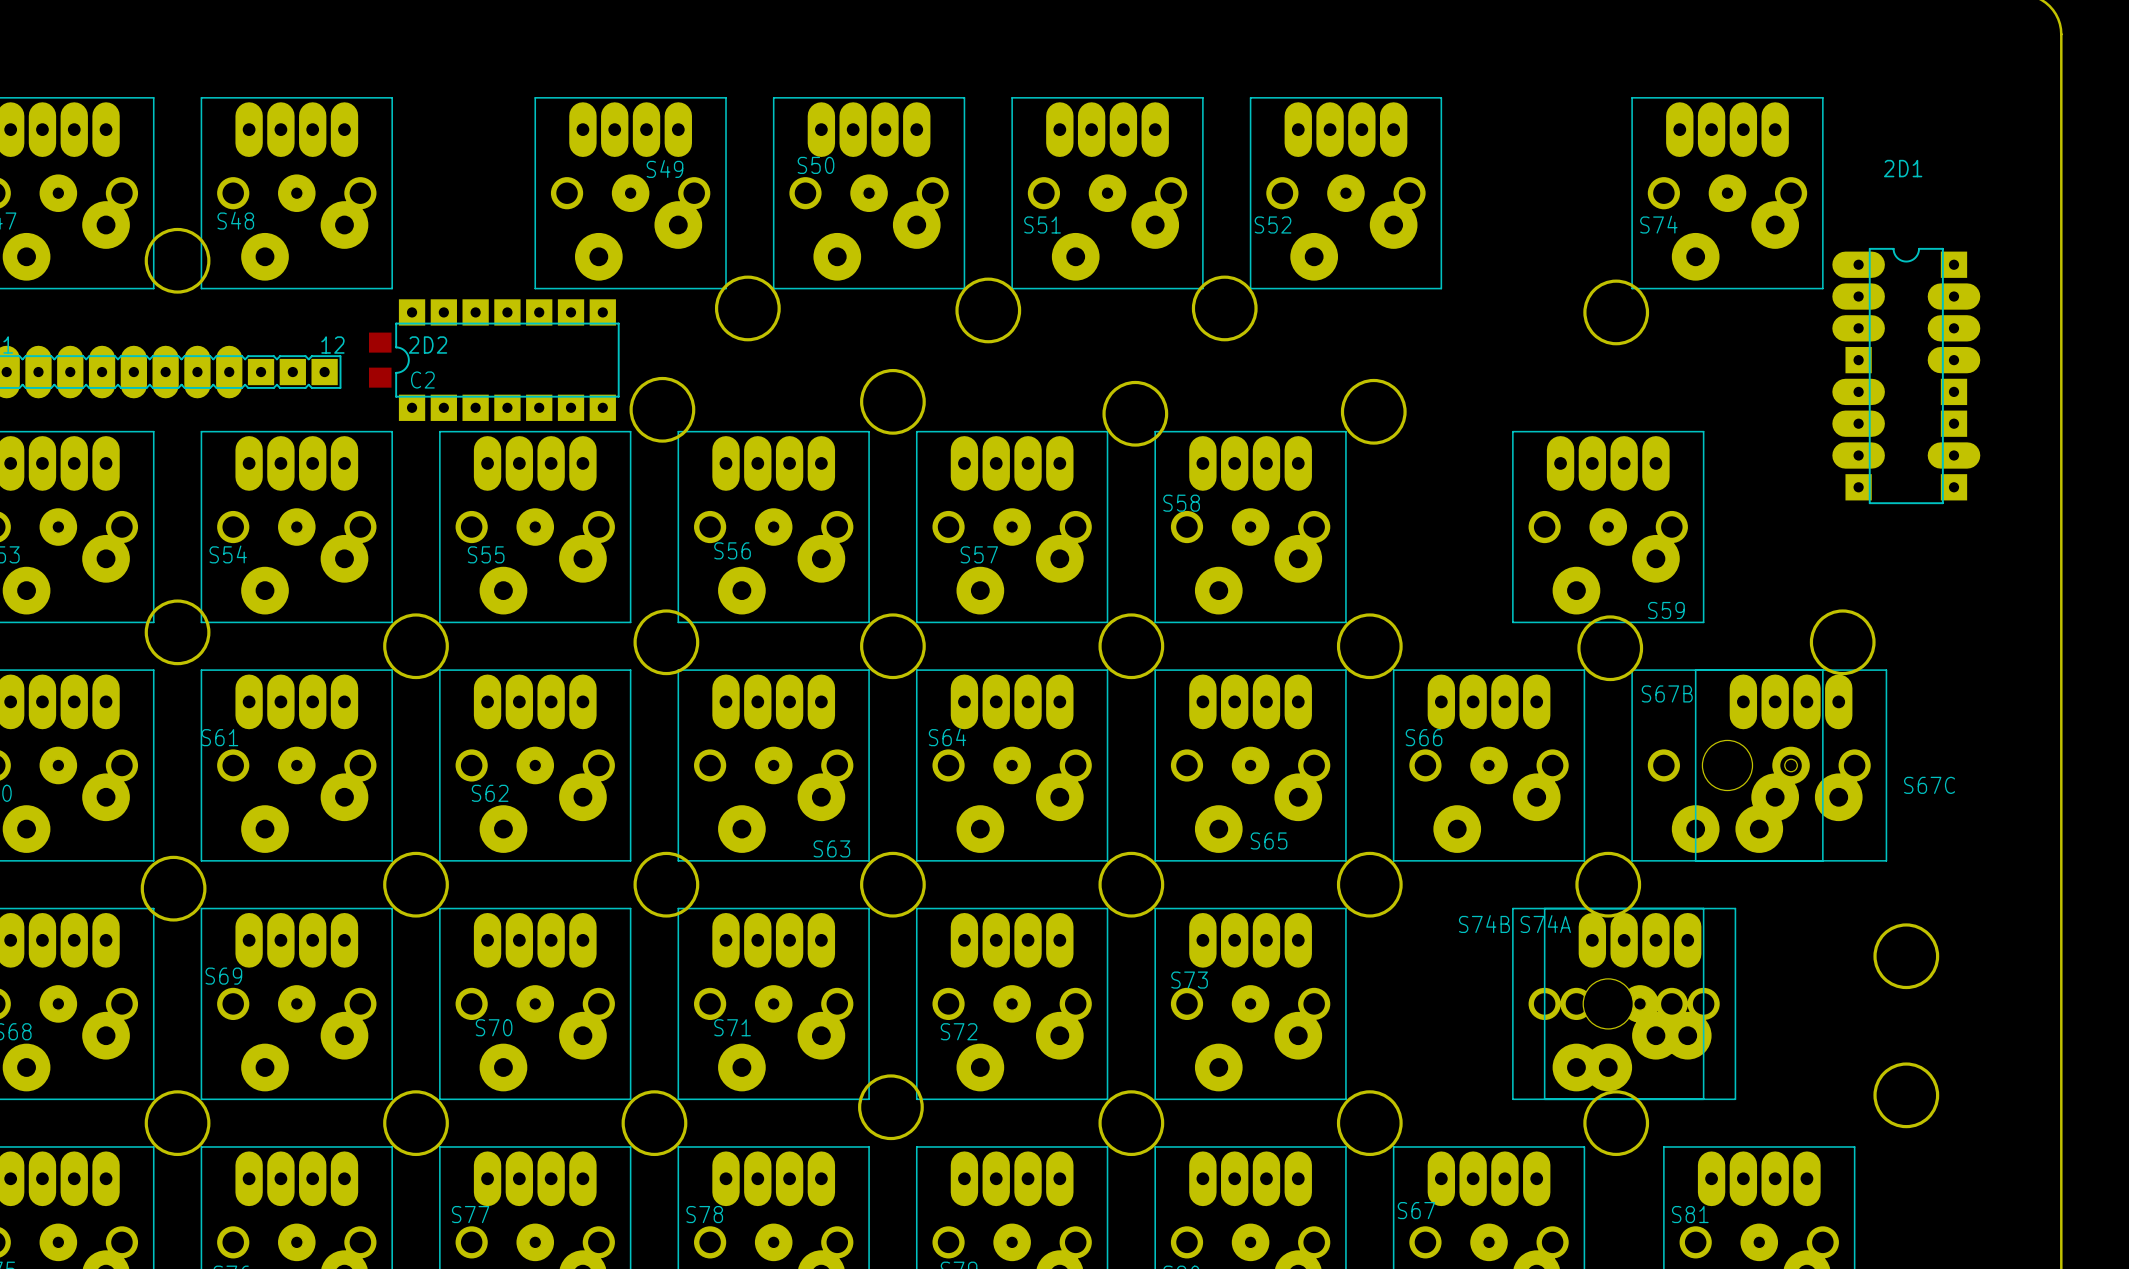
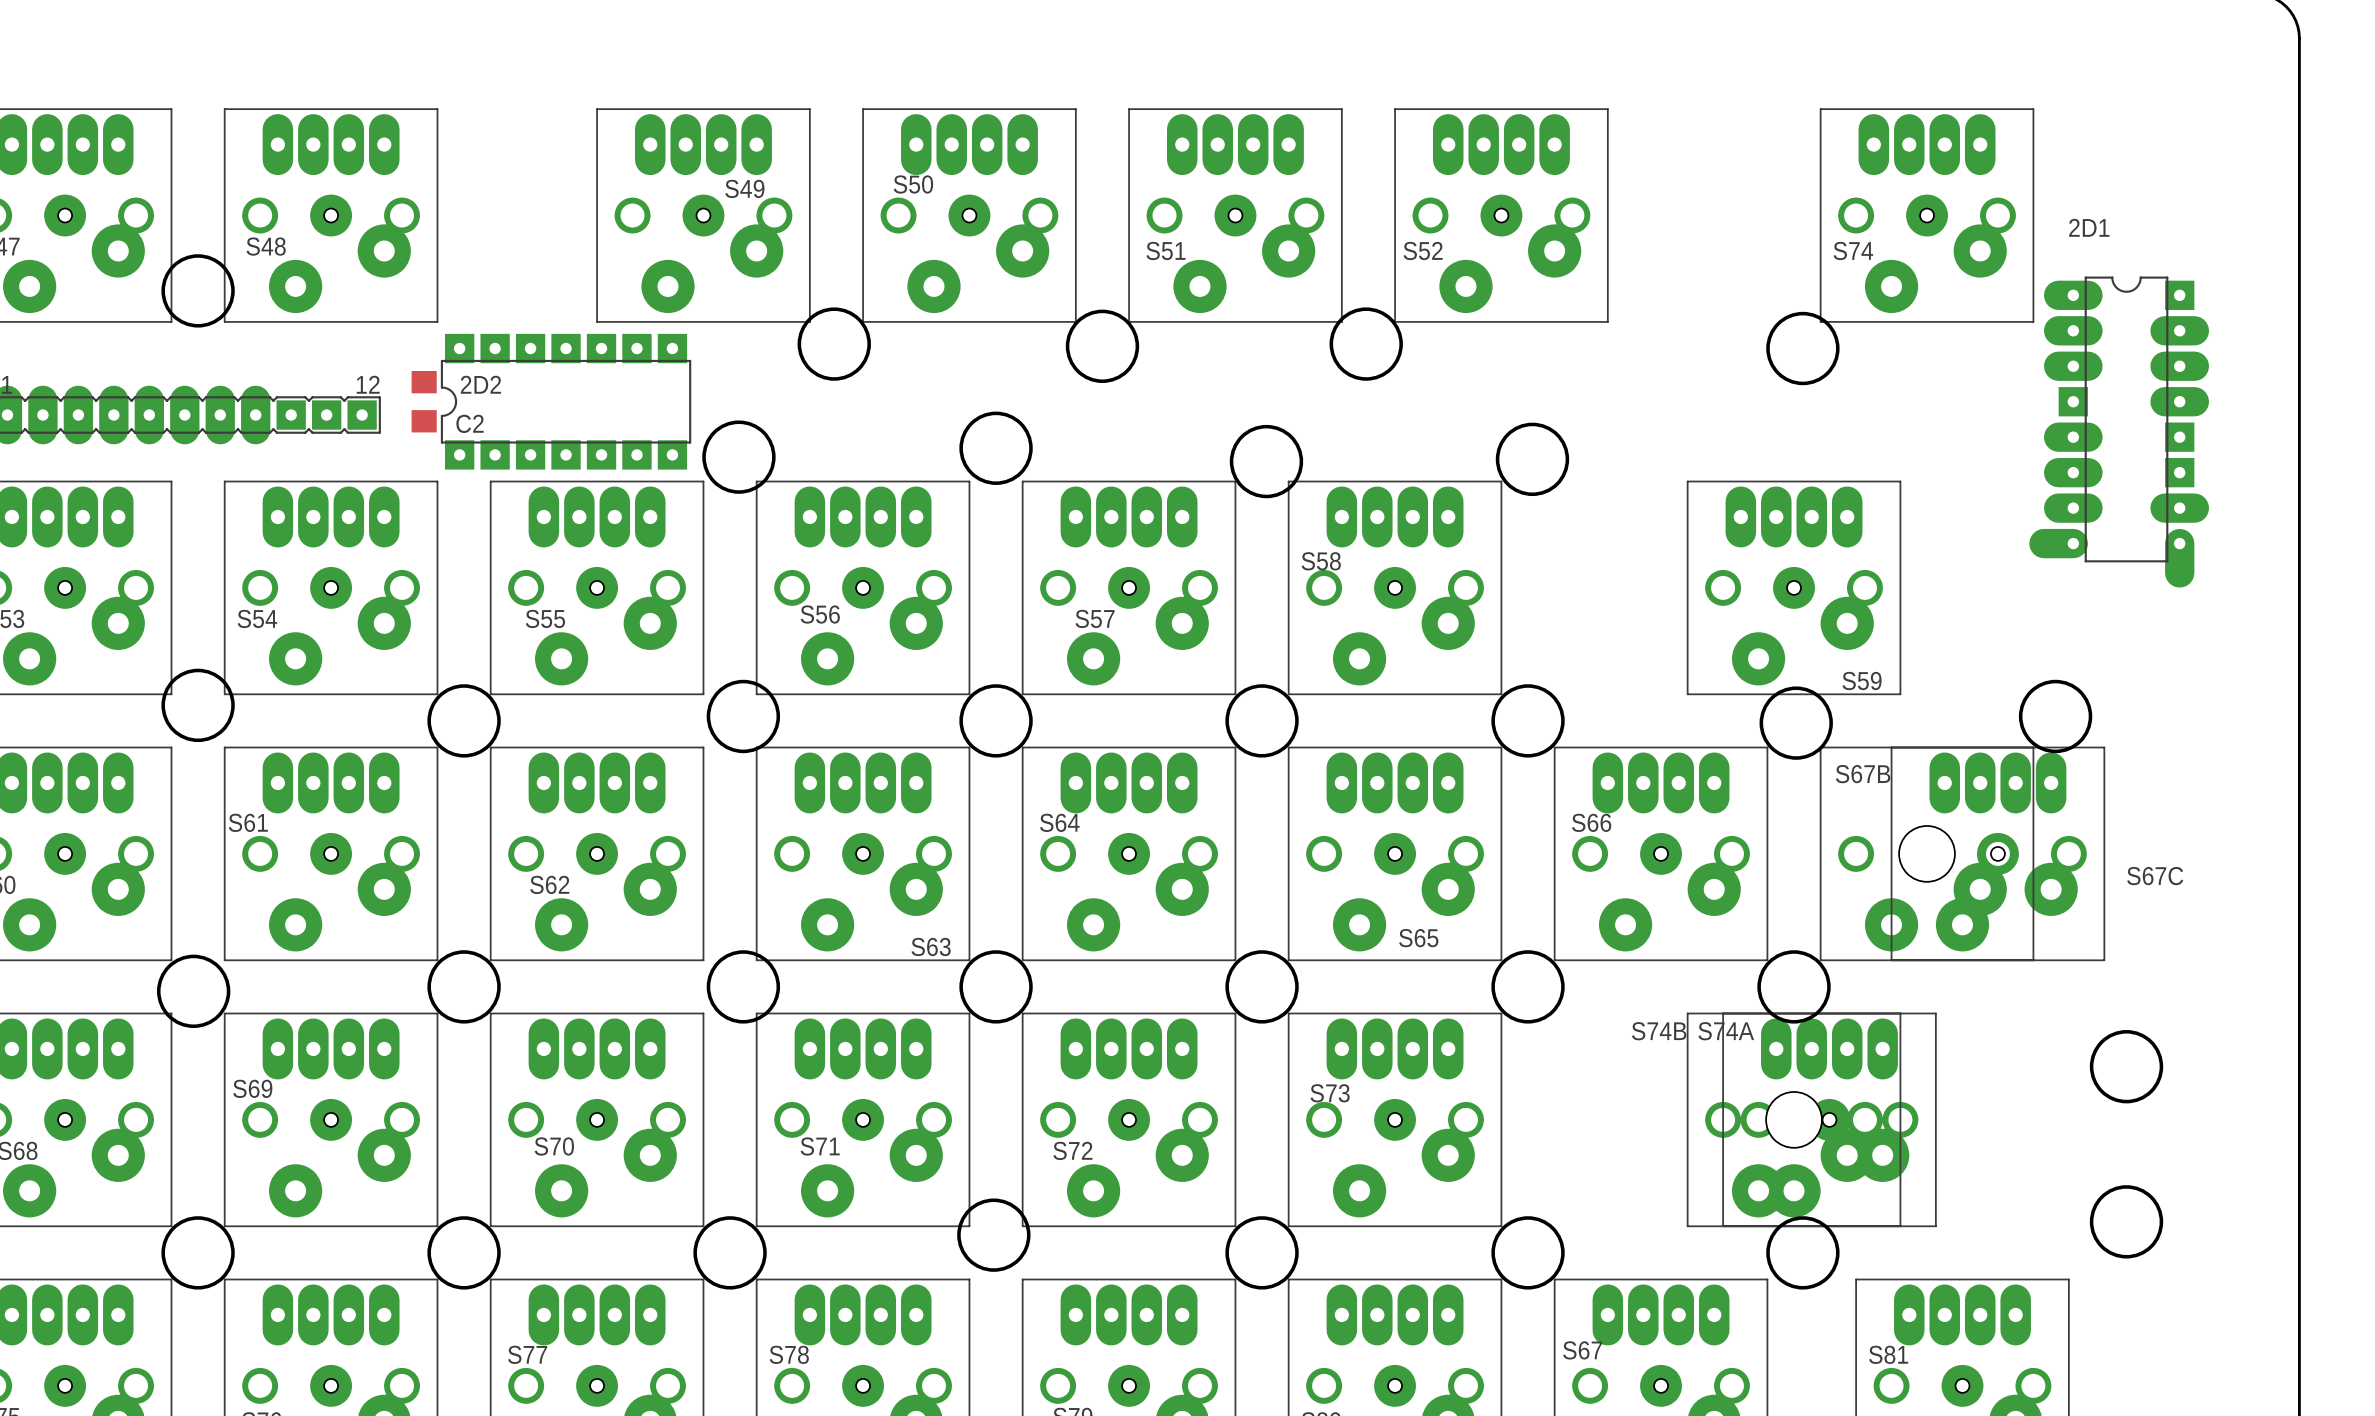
2D1 name position: 2D1 (1903, 168) -> 2D1 (2089, 227)
2D1 footprint: [1832, 247, 1981, 505] -> [2029, 276, 2210, 588]

